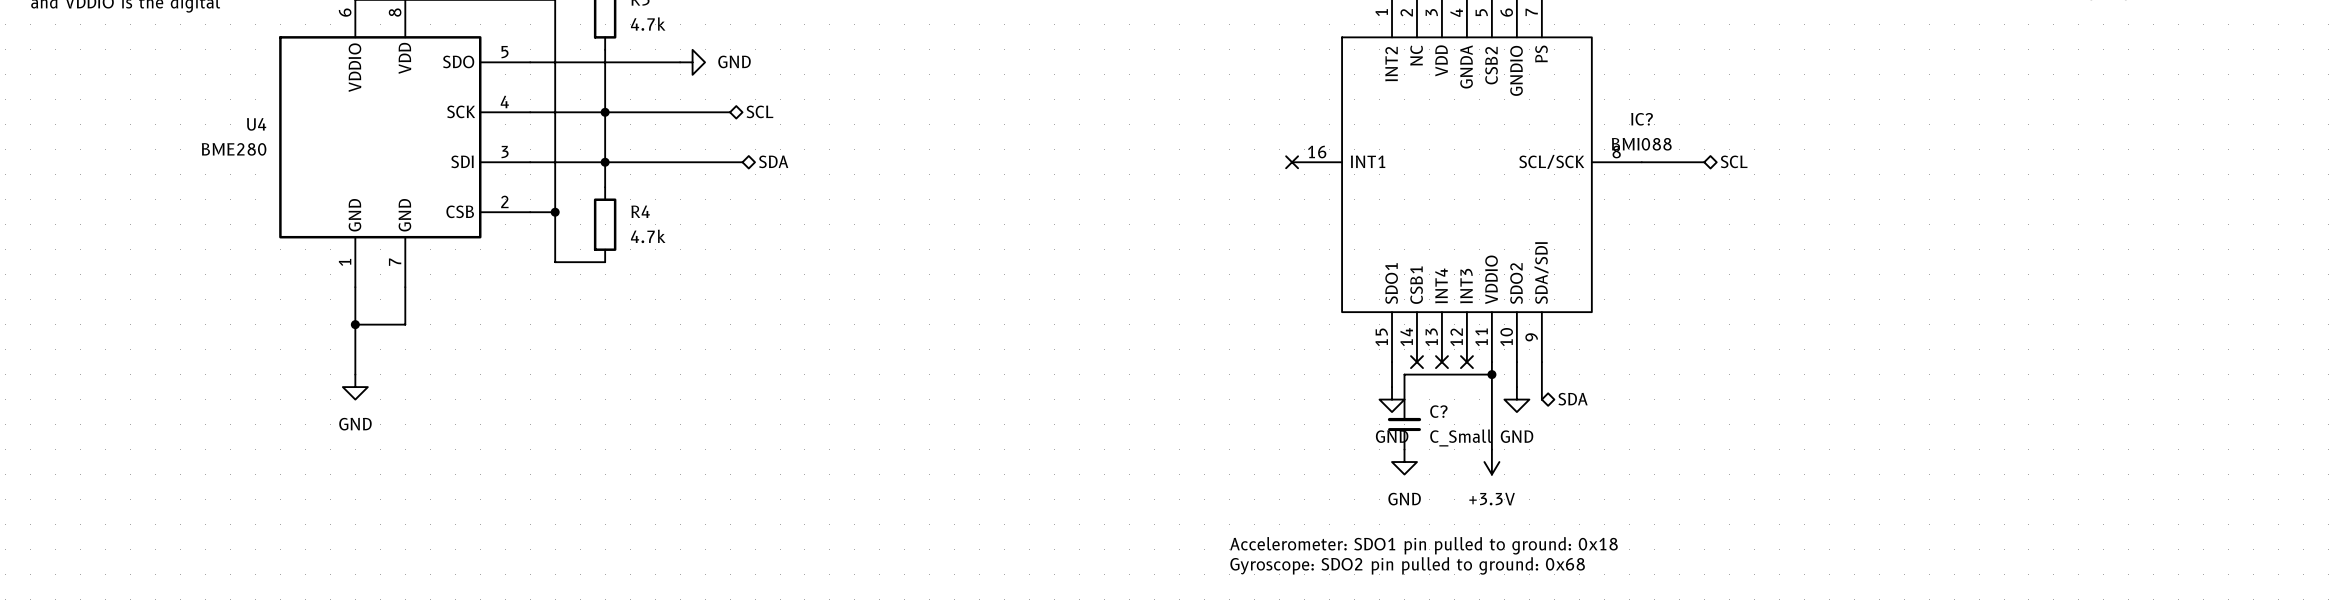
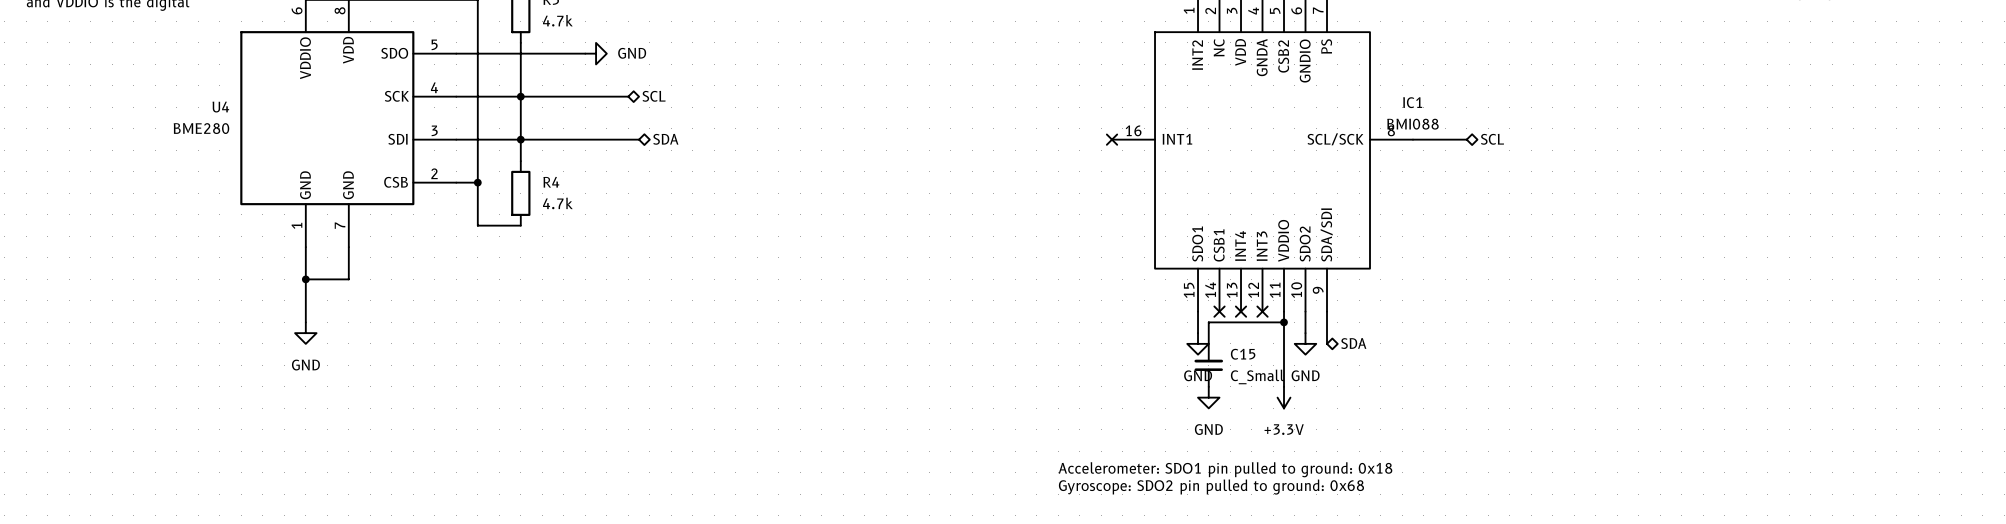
IC? name: IC? (1642, 119) -> IC1 (1412, 102)
C? name: C? (1438, 411) -> C15 (1243, 354)

